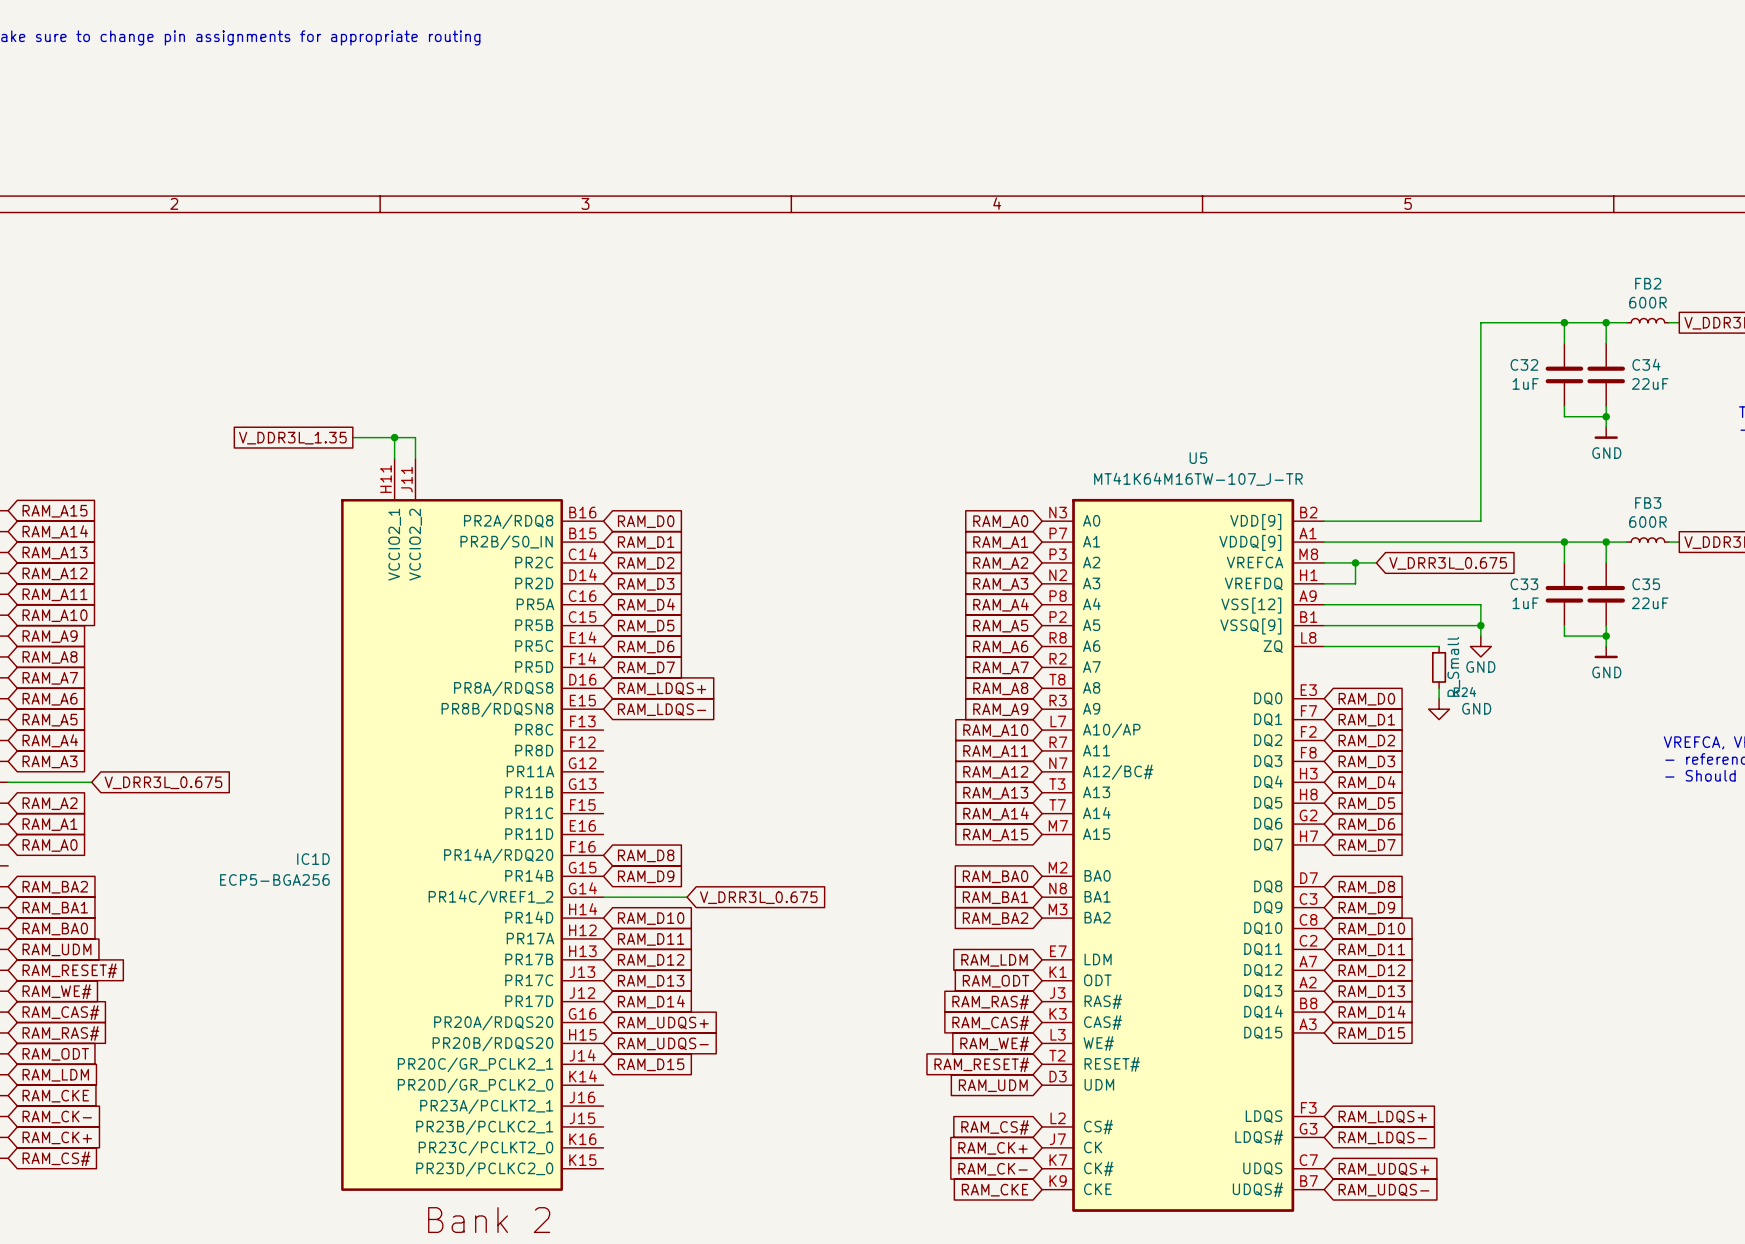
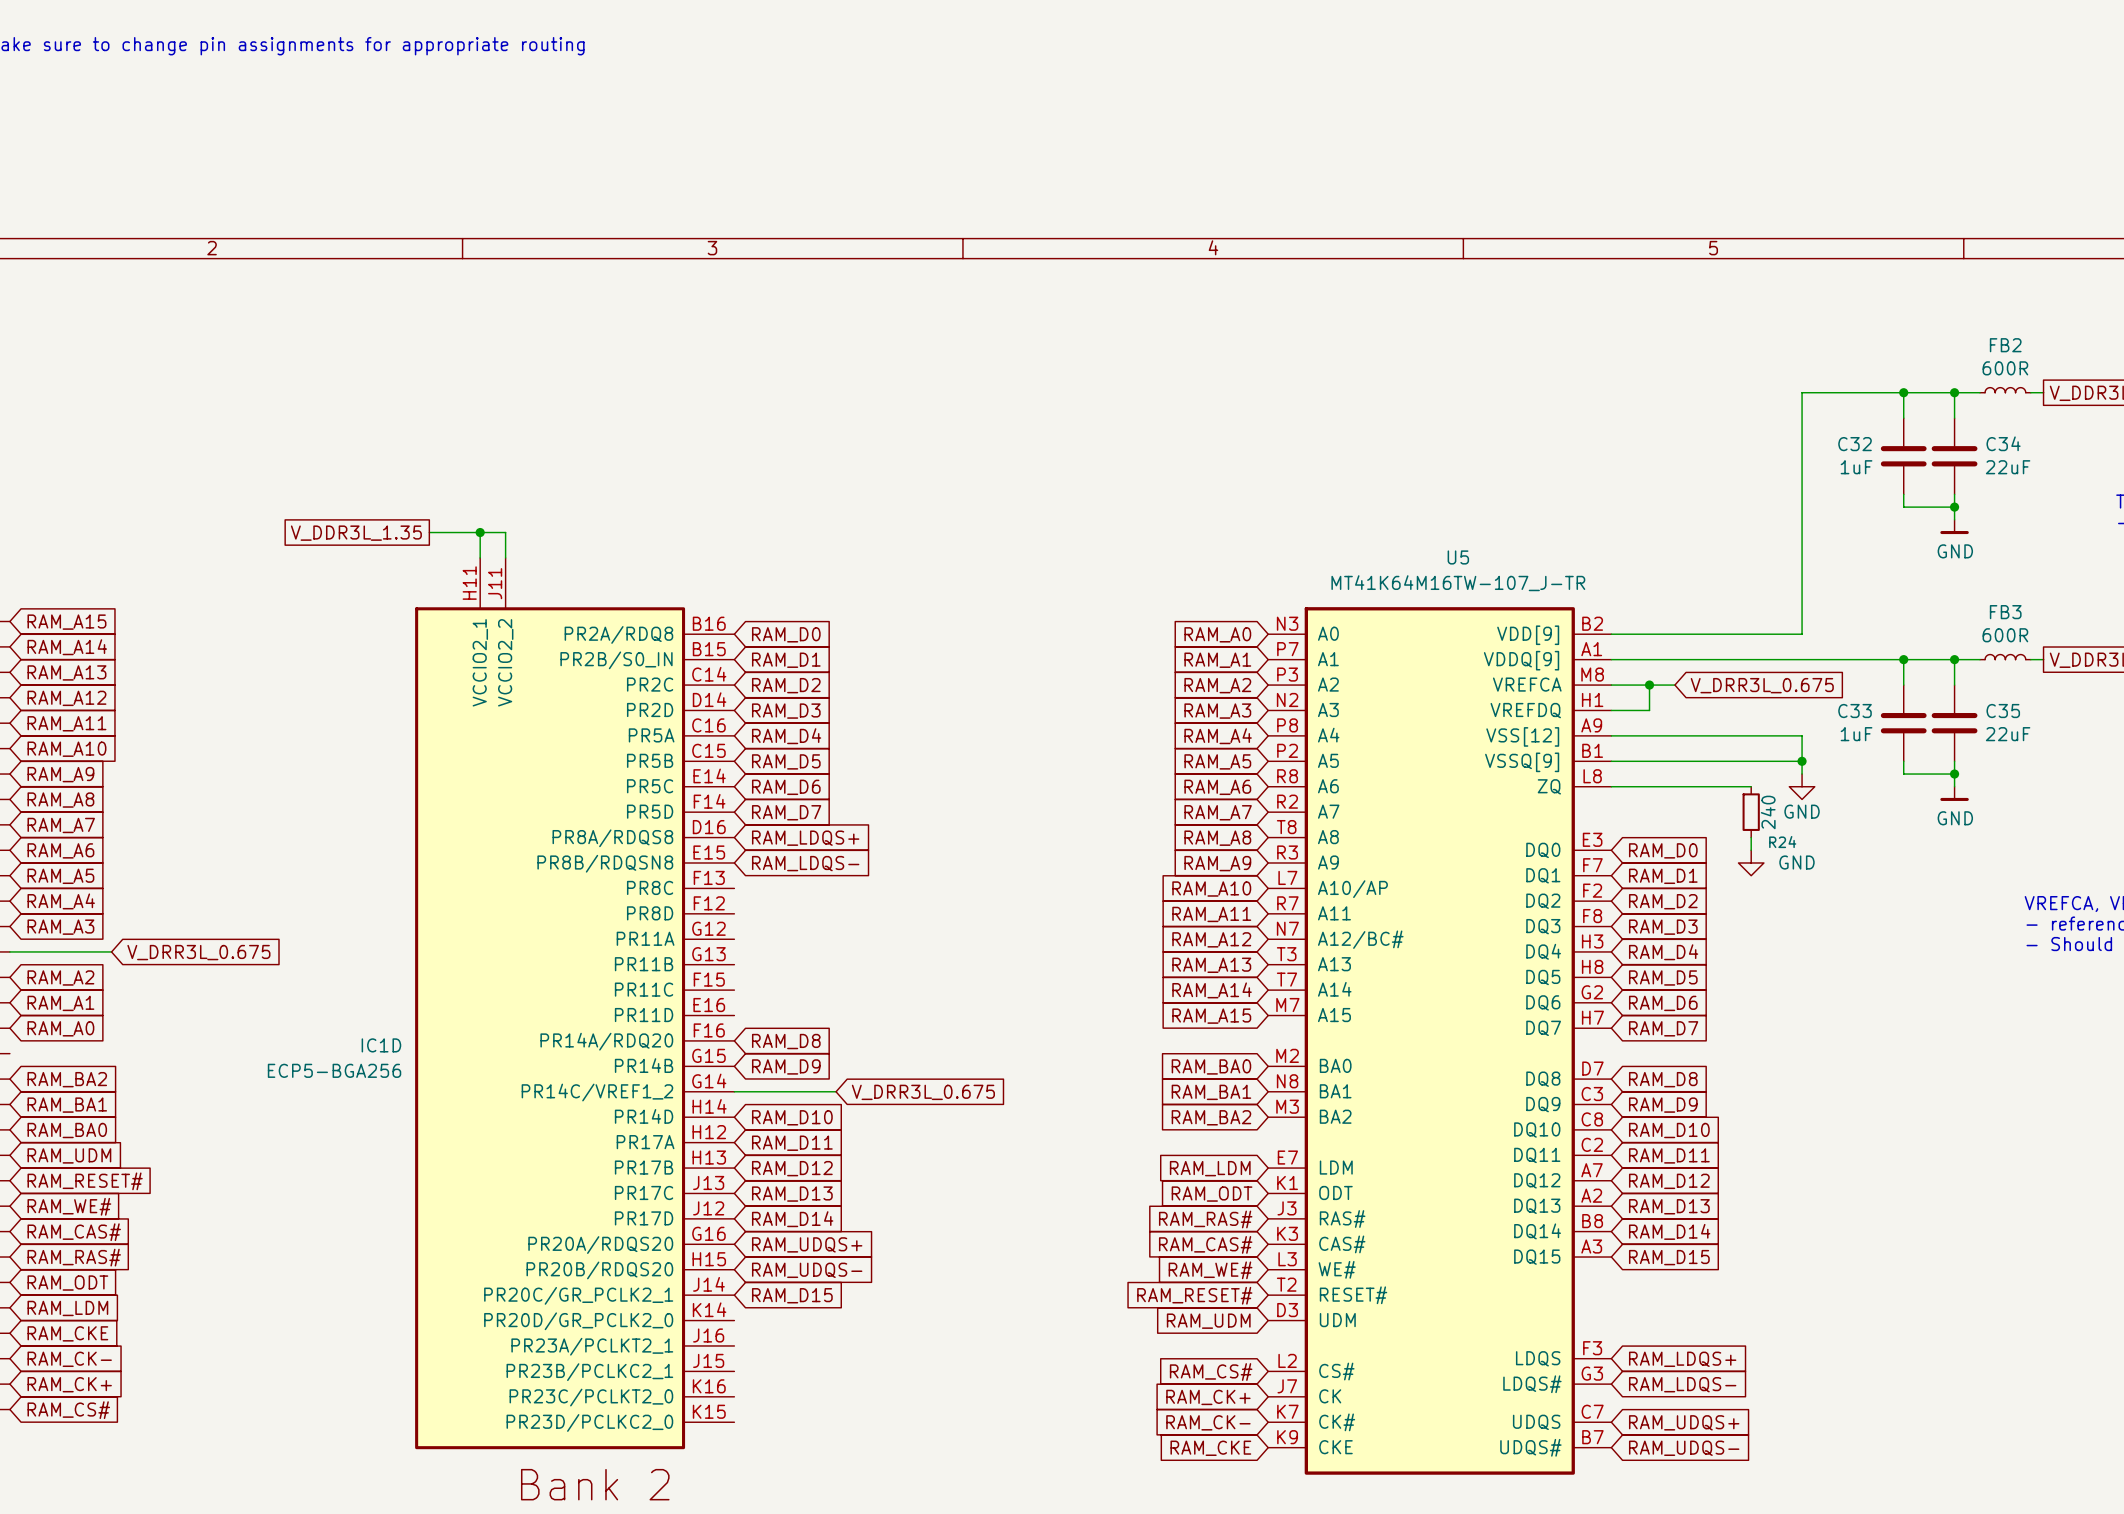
R24 value: R_Small (1453, 666) -> 240 (1768, 812)

